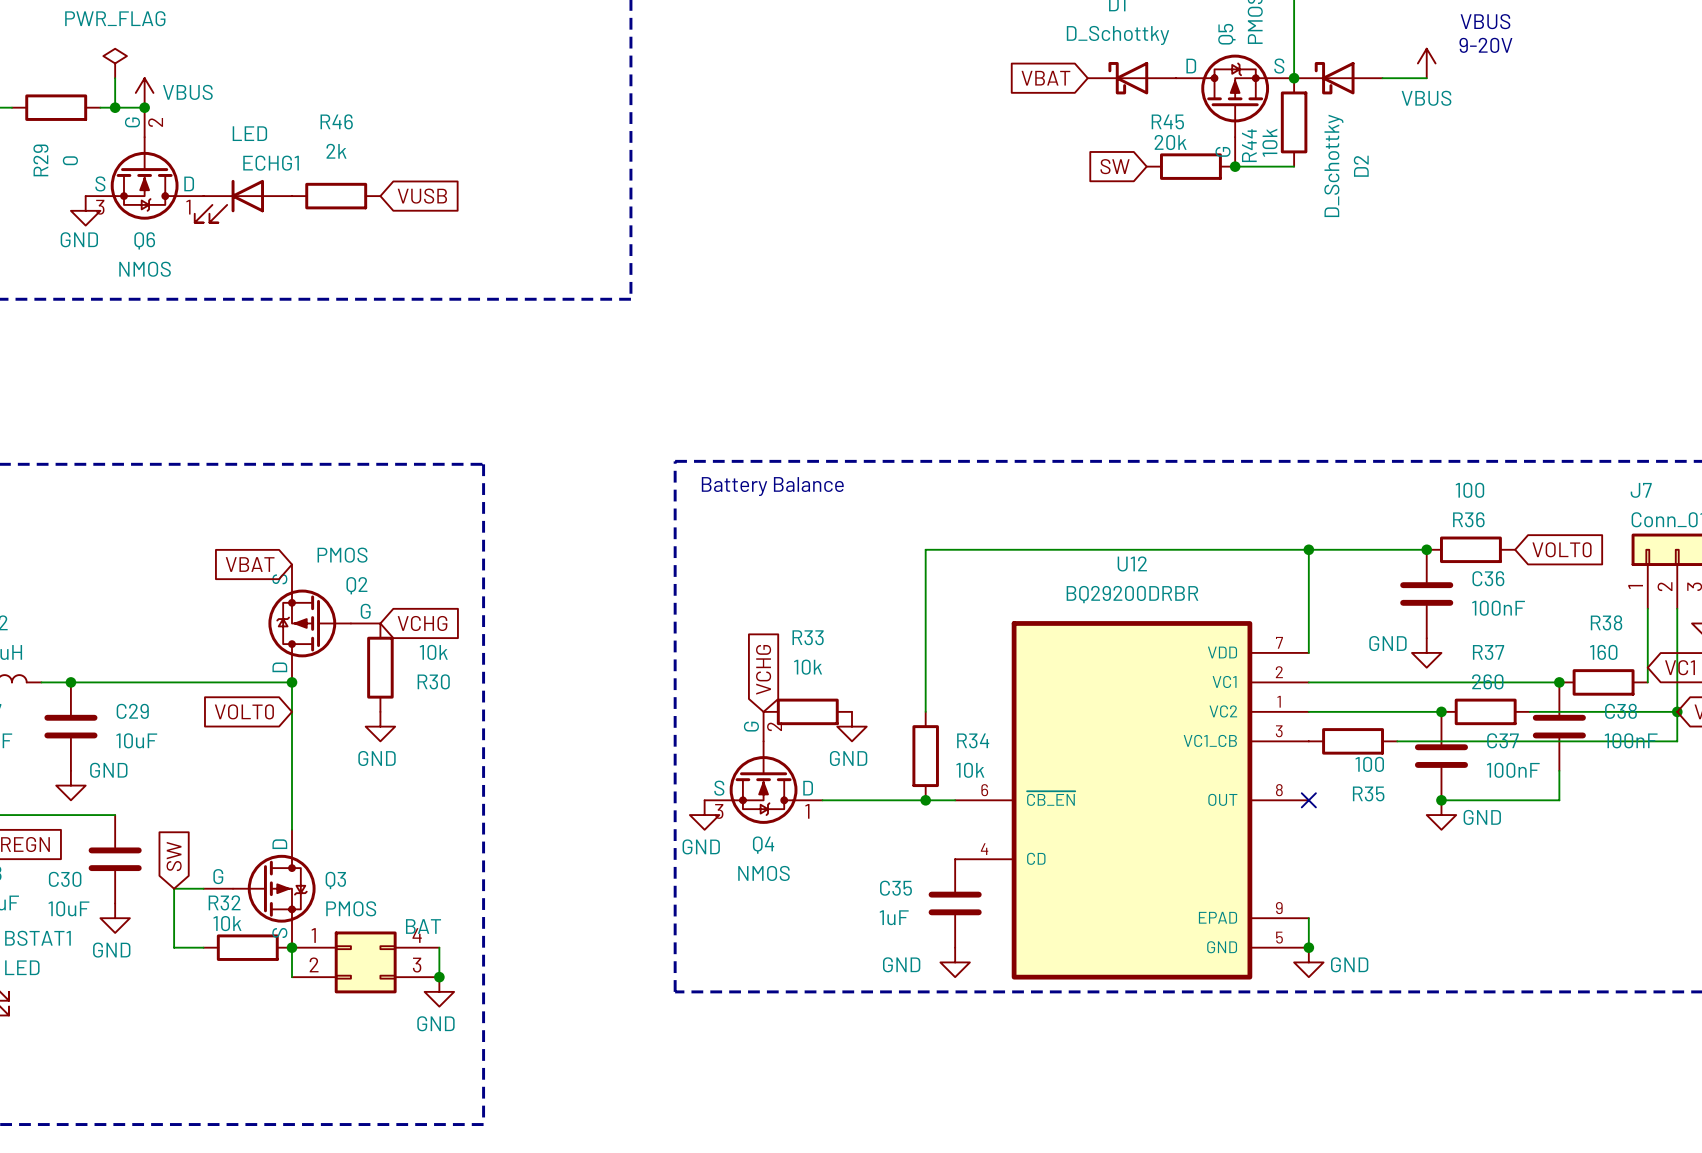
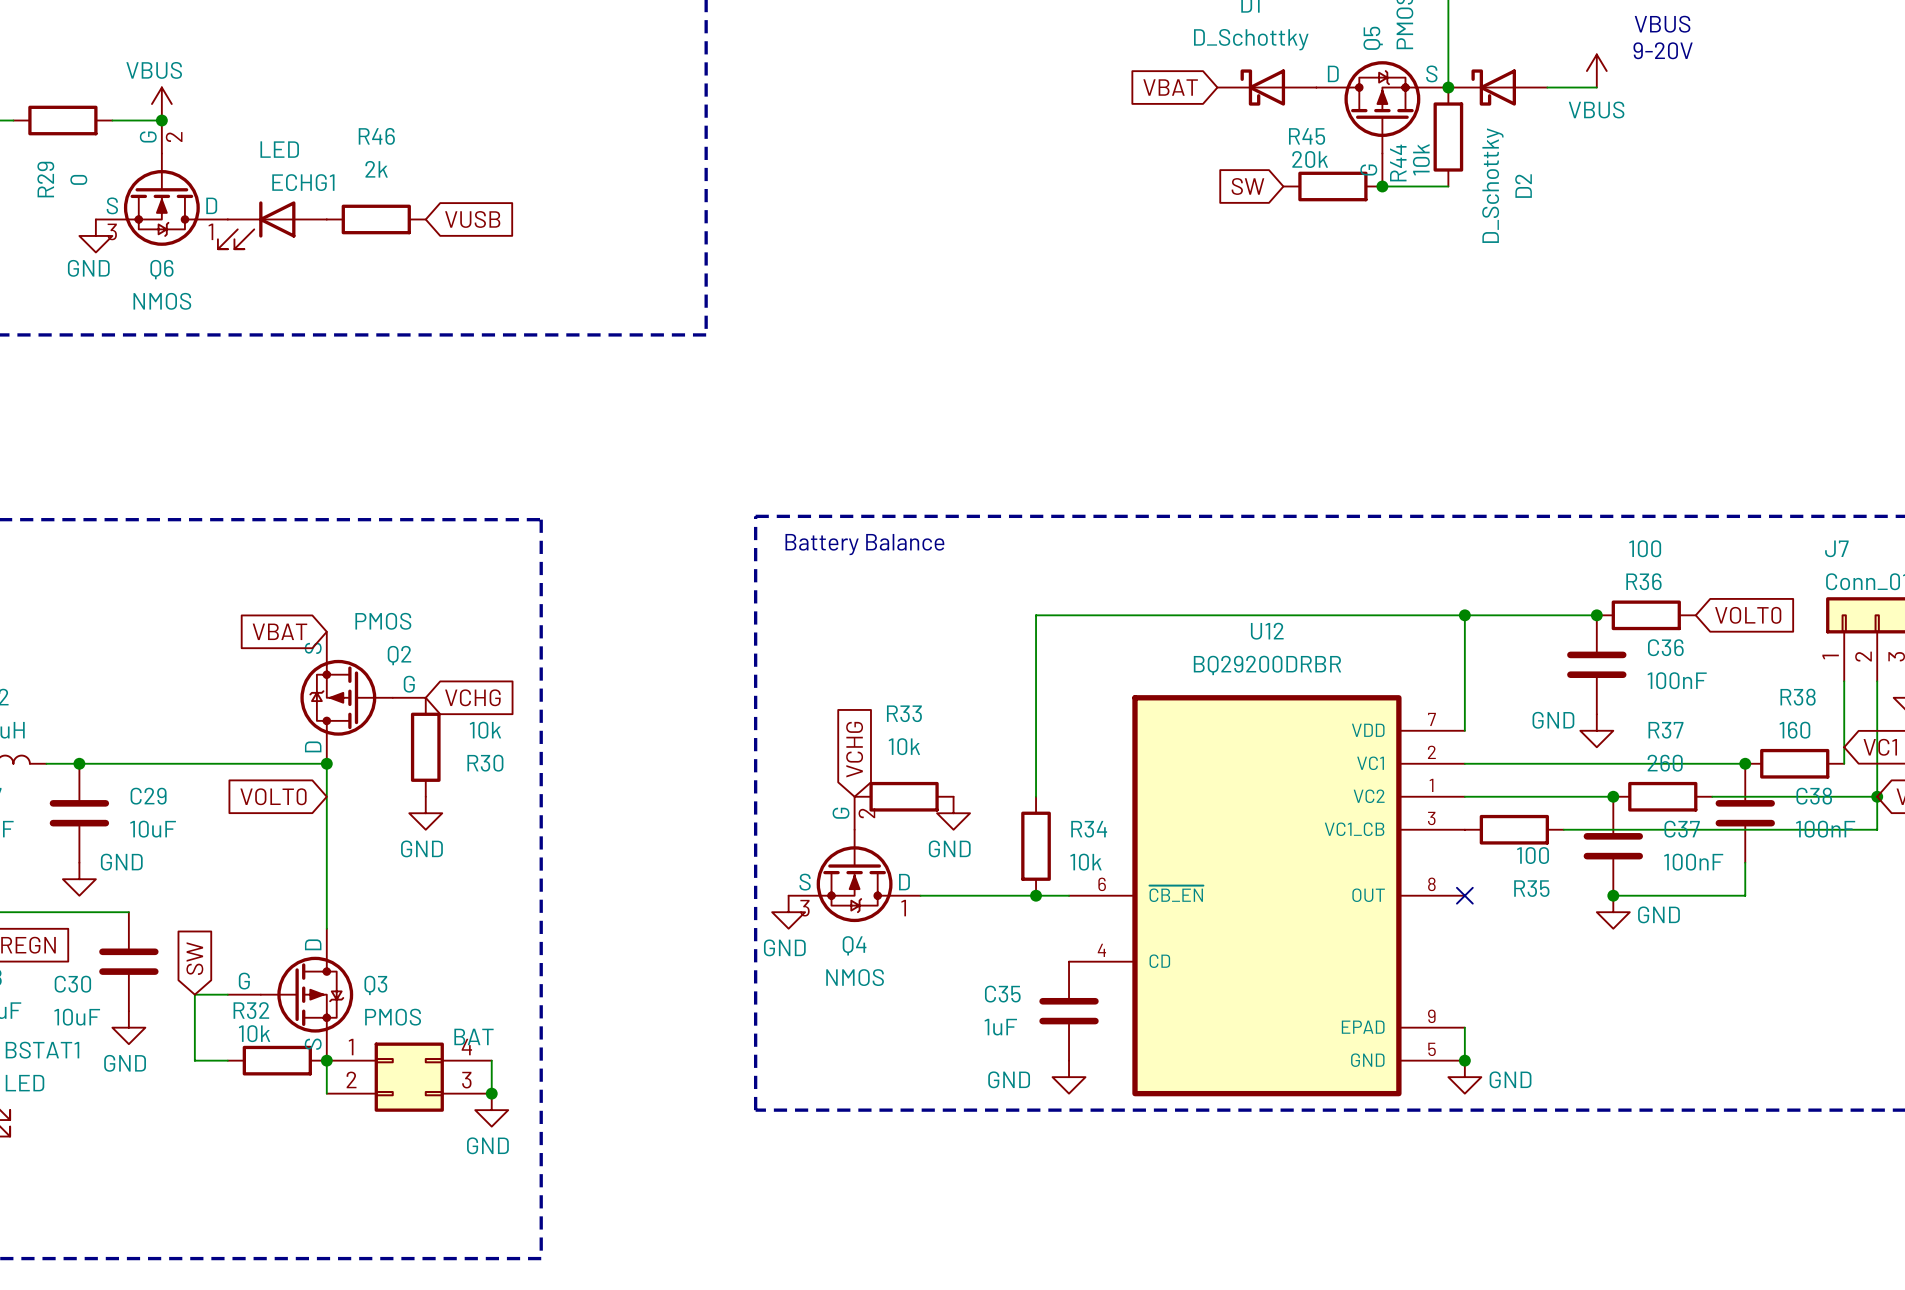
power symbol: PWR_FLAG (115, 63) -> none
wire: (115, 78) (115, 107) -> none
power symbol text position: VBUS (187, 92) -> VBUS (154, 70)
junction: (115, 107) -> none

